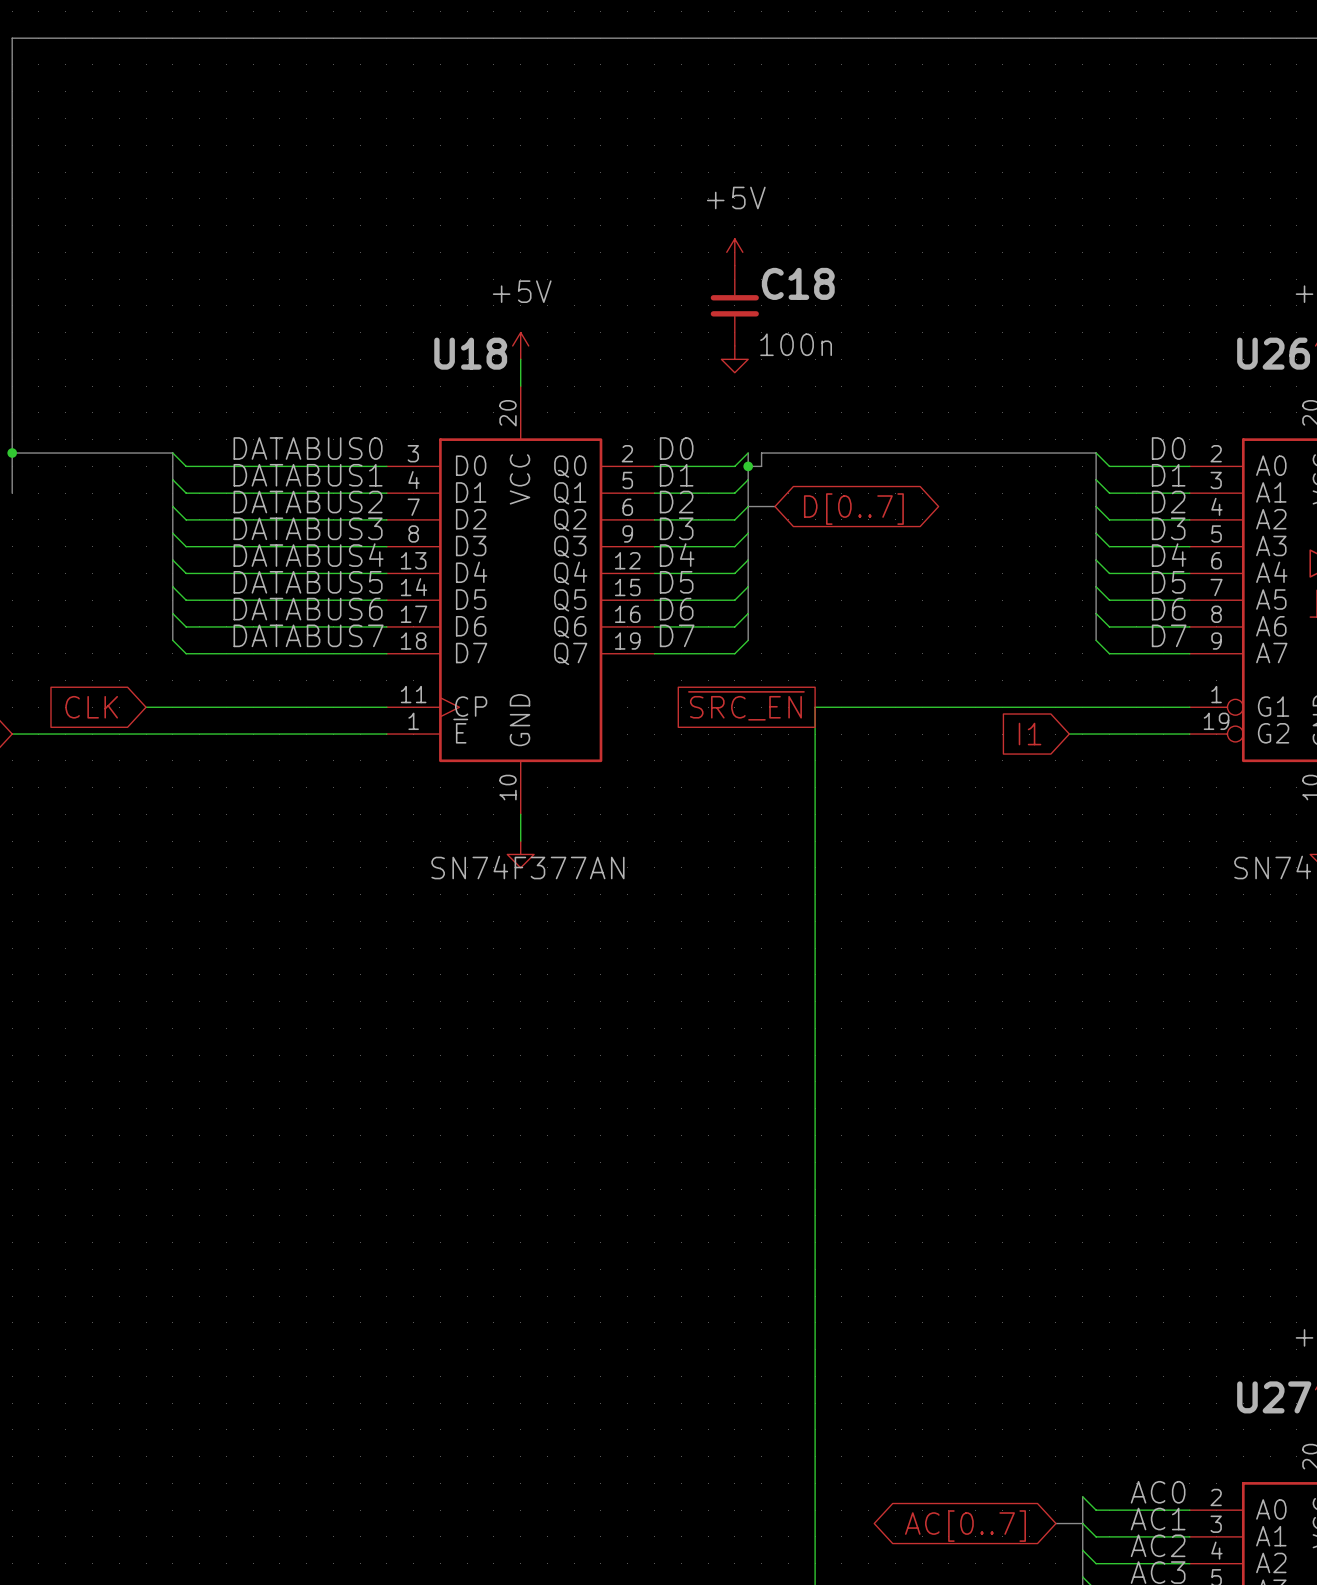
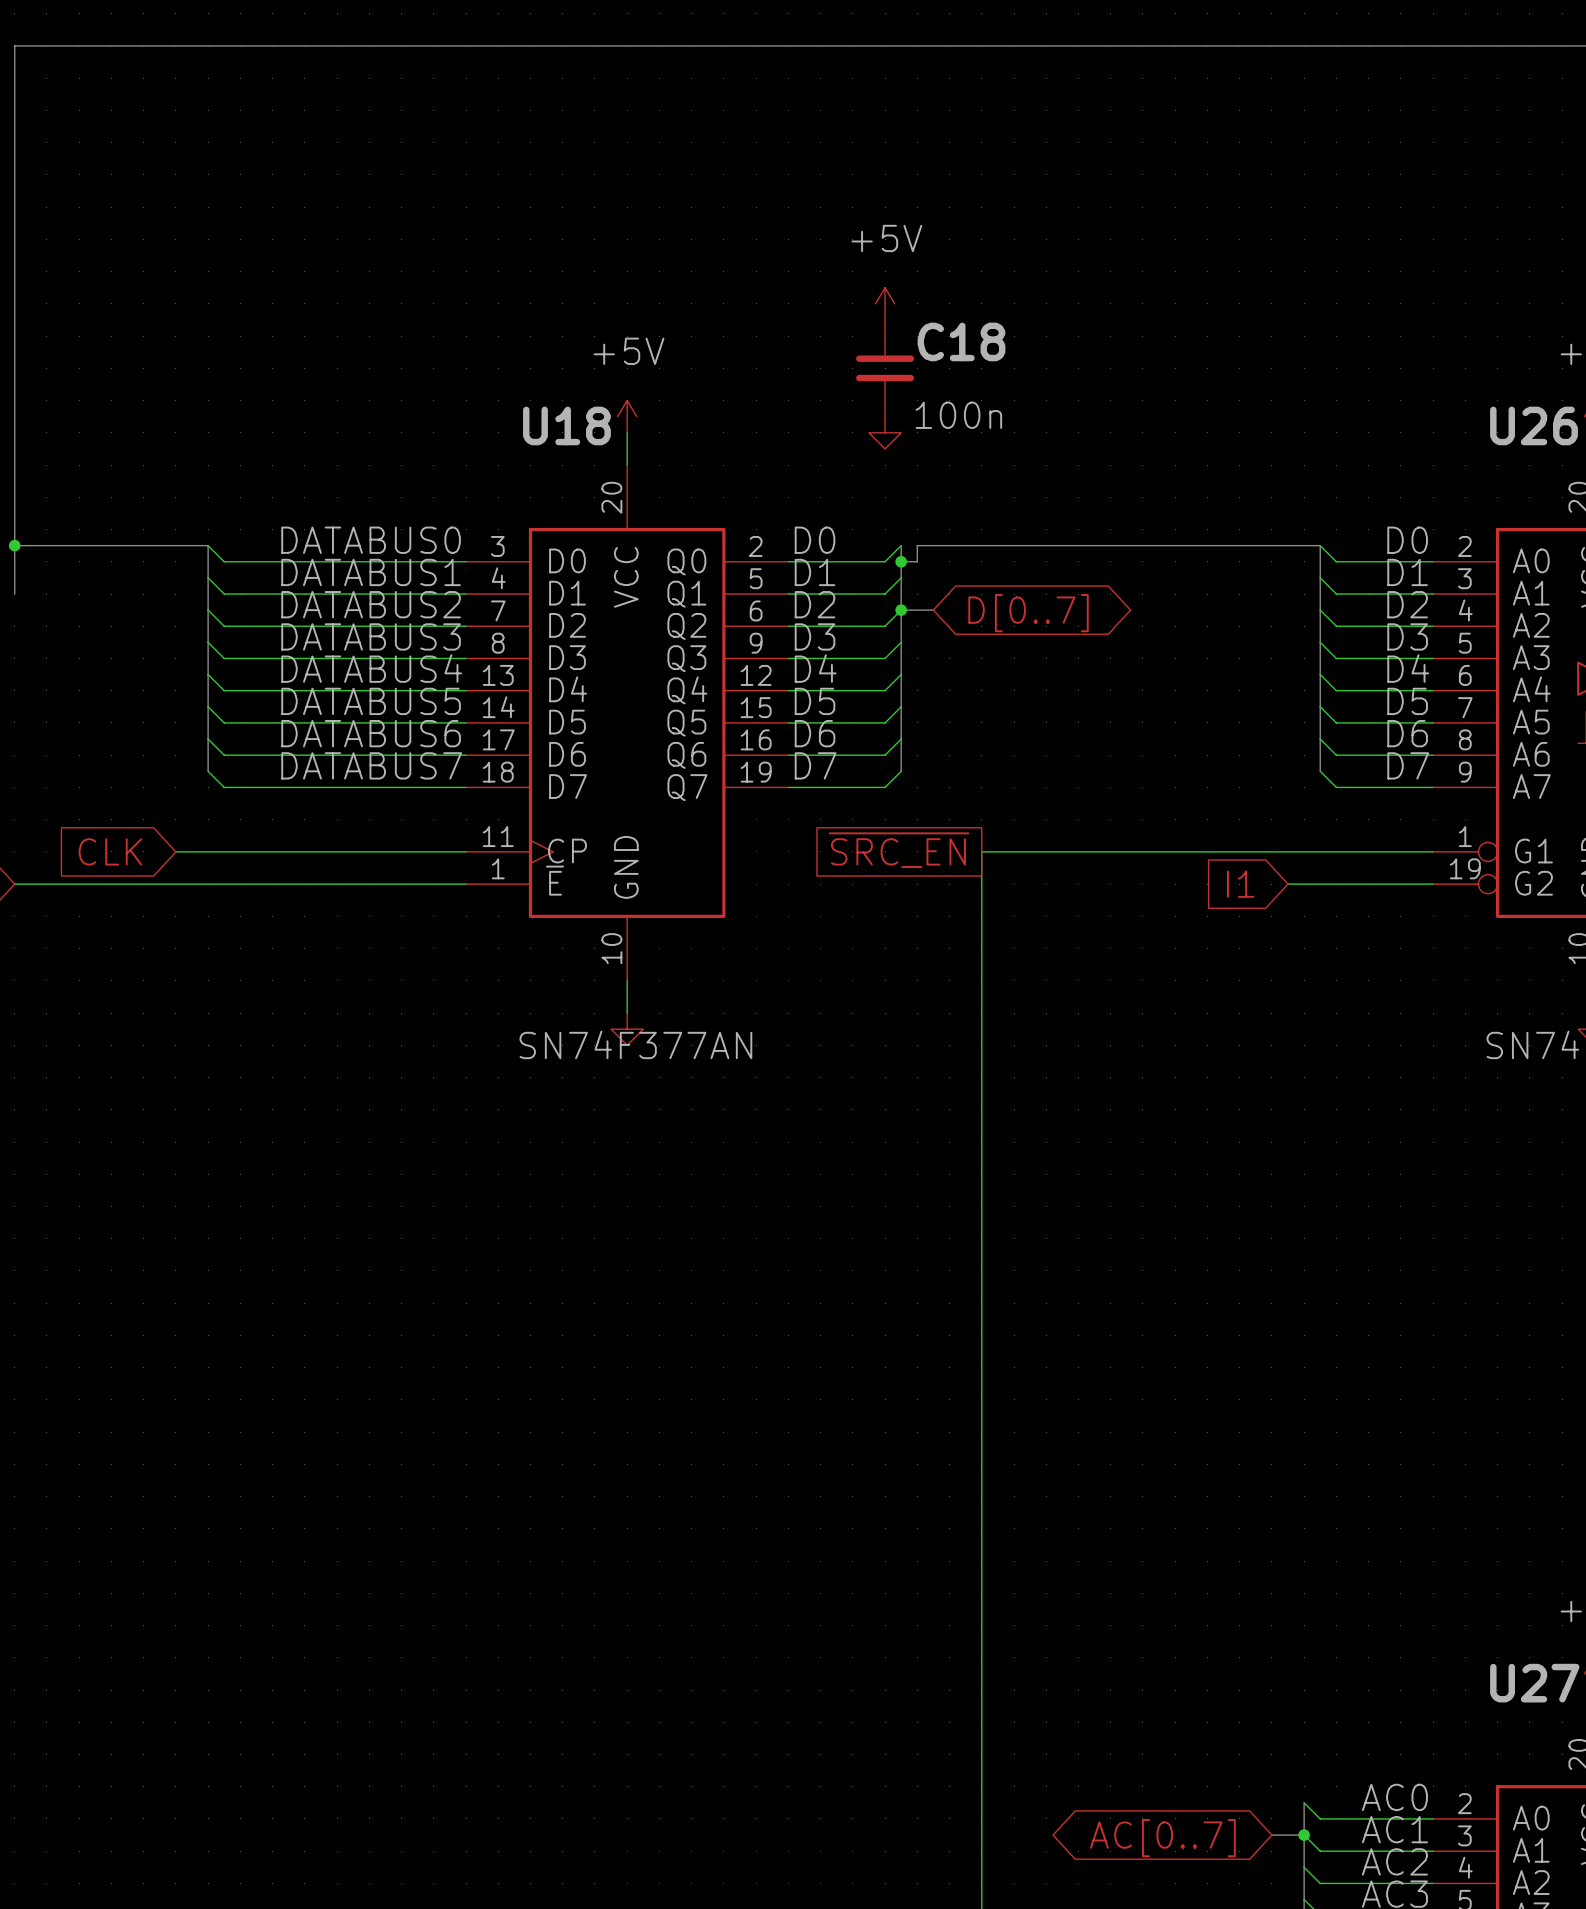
junction: none -> (901, 610)
junction: none -> (1304, 1835)

